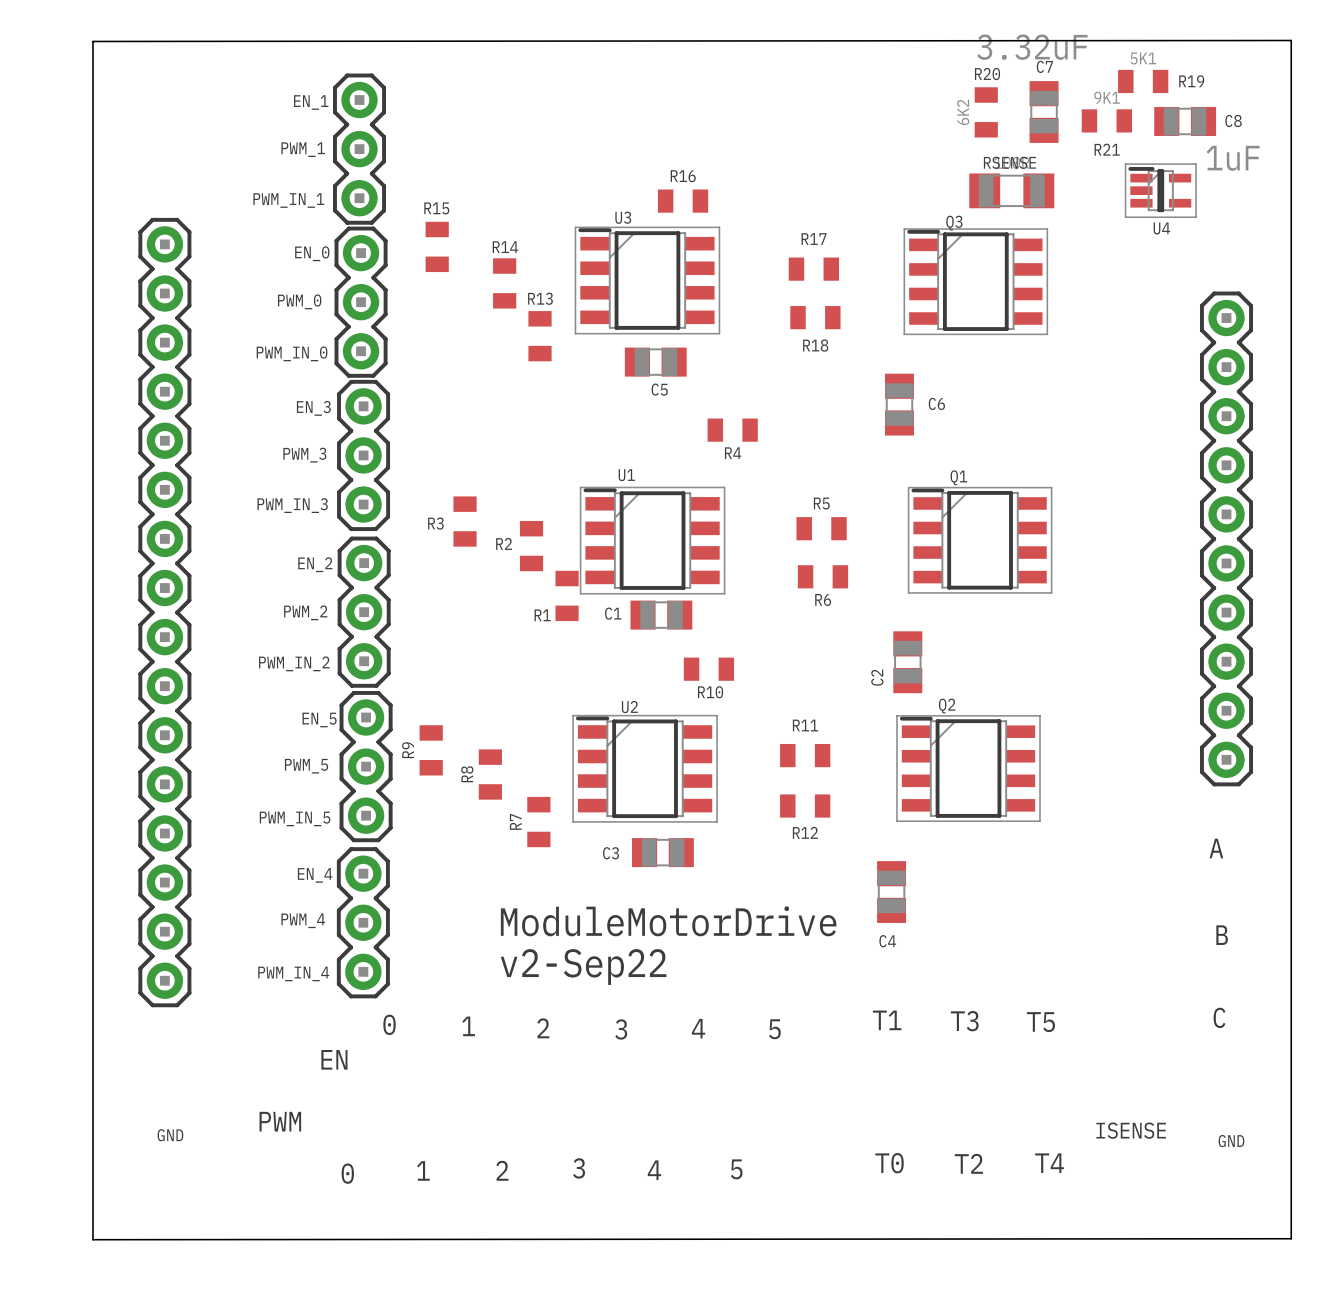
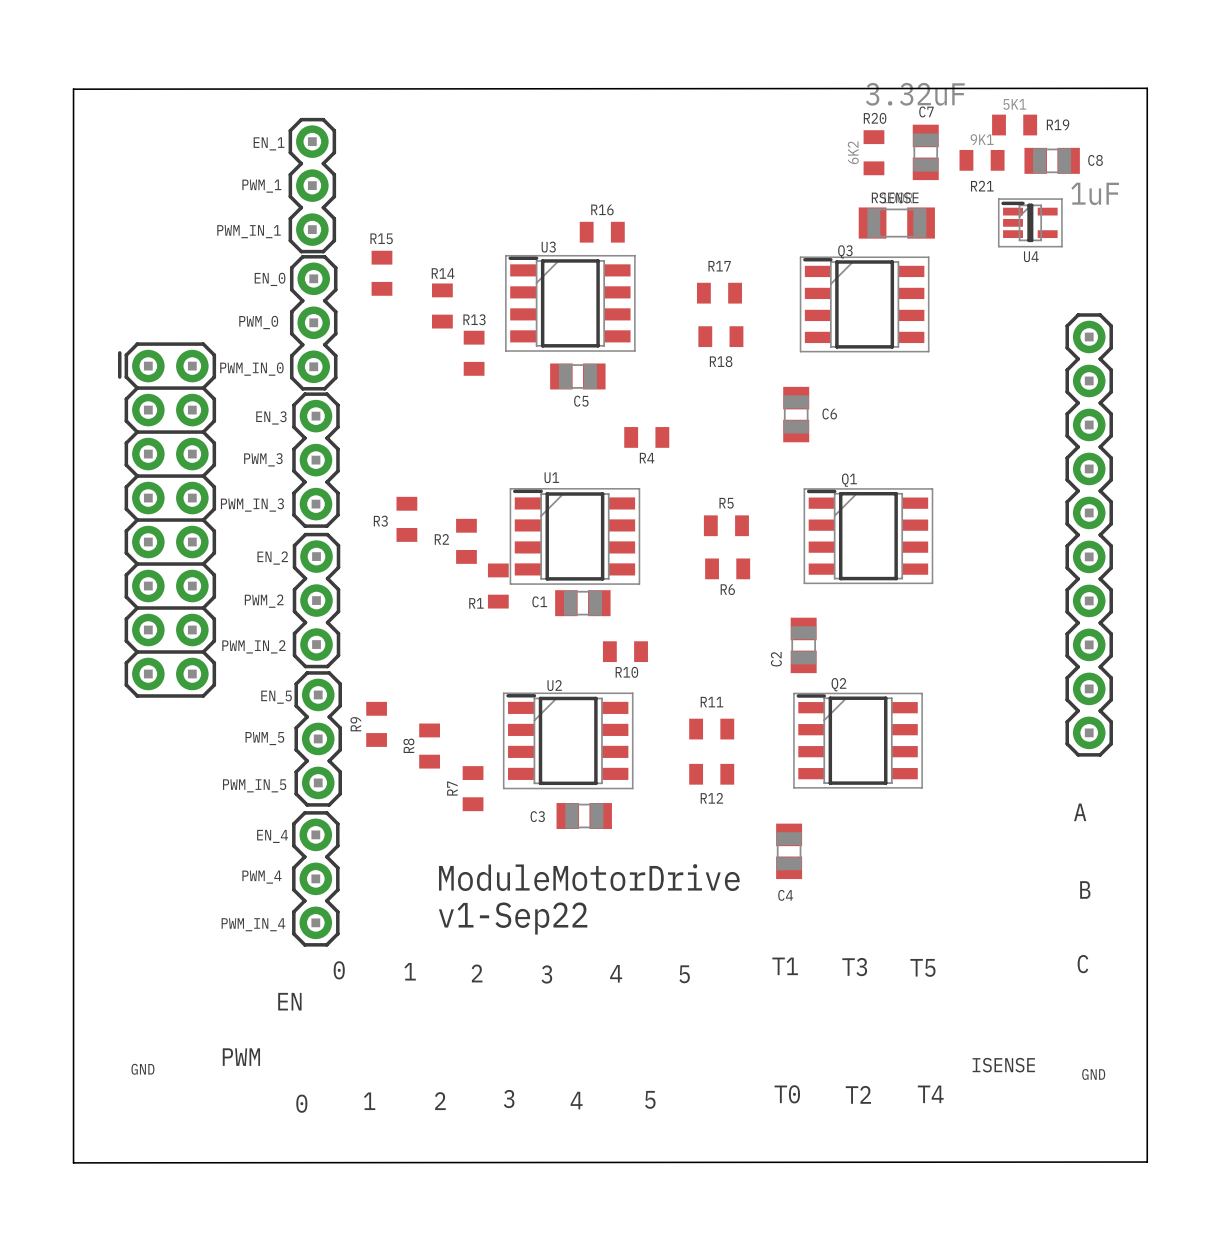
part: none -> (167, 520)
part: (164, 612) -> none
text: v2-Sep22 (583, 967) -> v1-Sep22 (513, 918)

